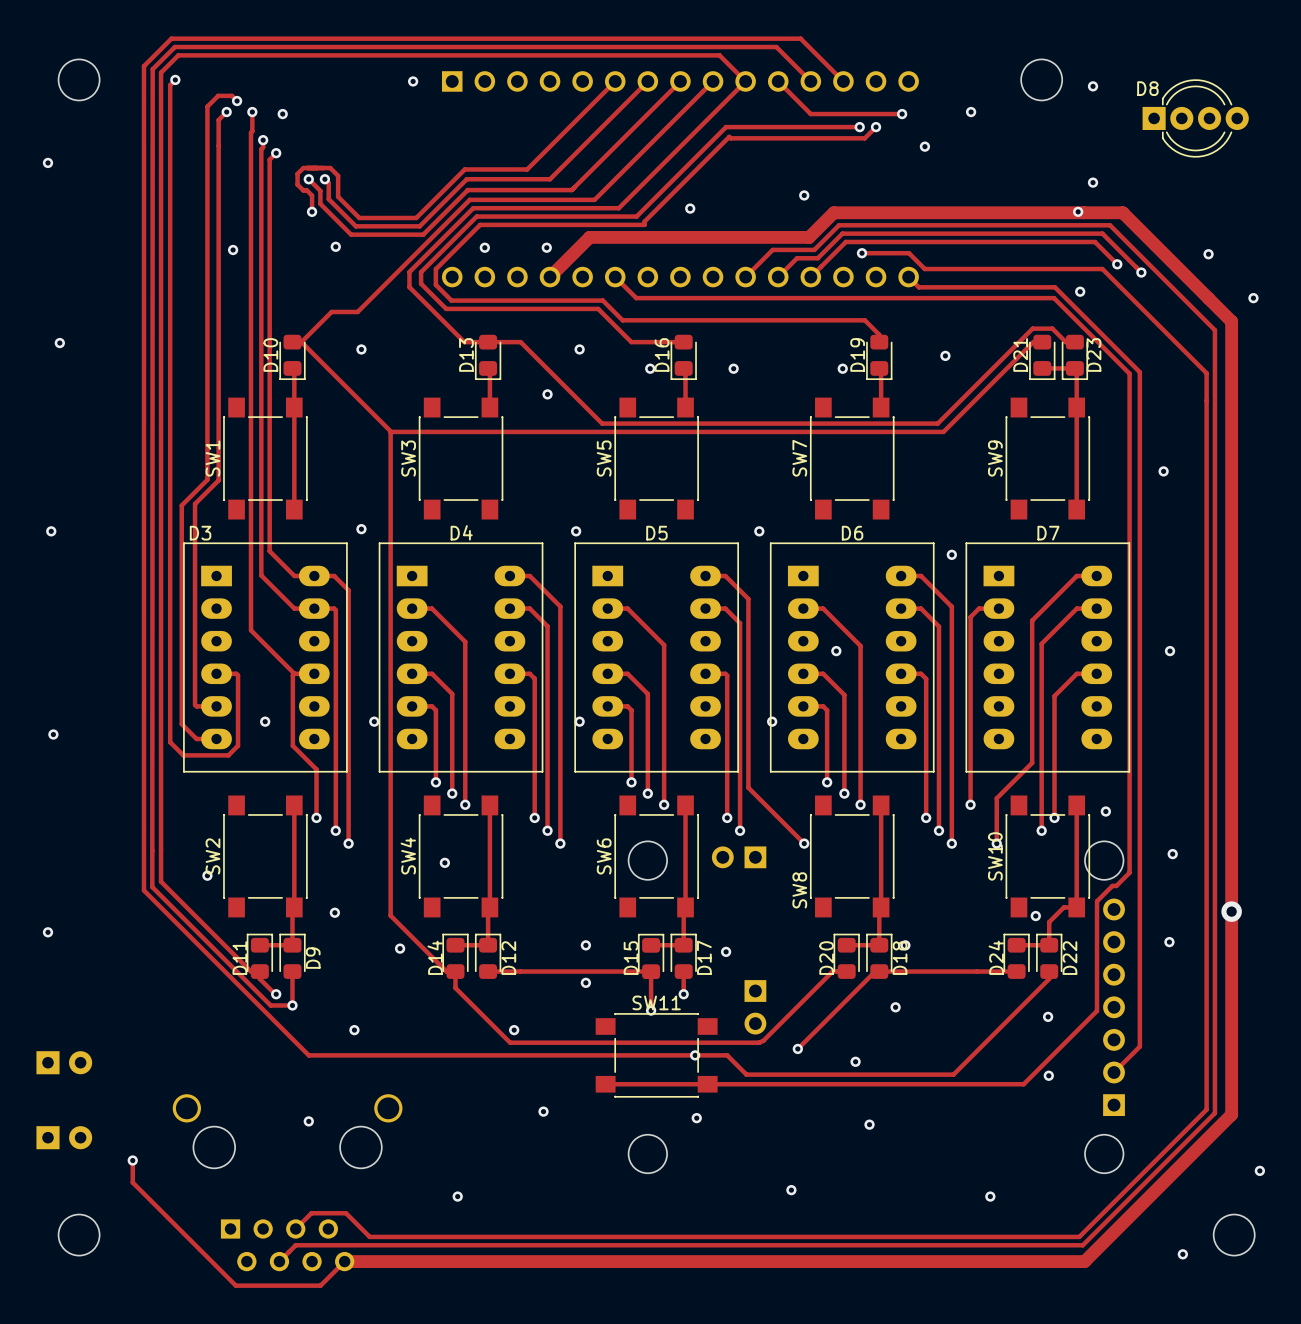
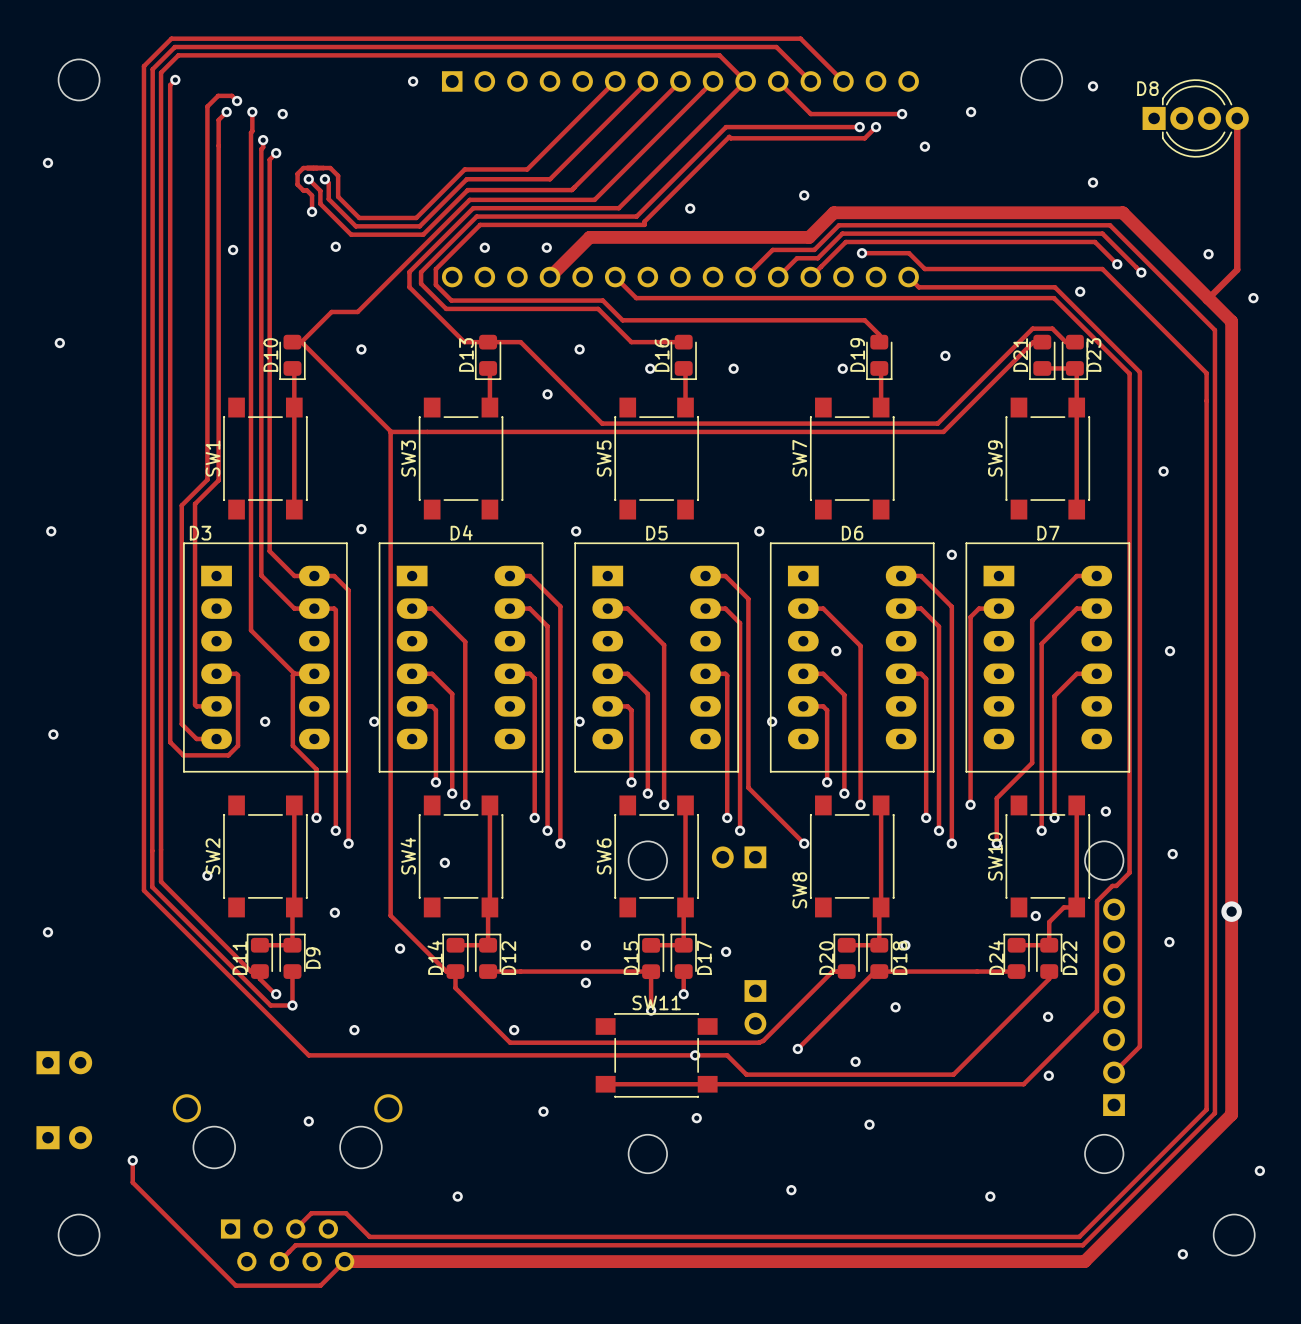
track: none -> (1237, 118) (1237, 269) (1208, 298)
via: (1078, 211) -> none

